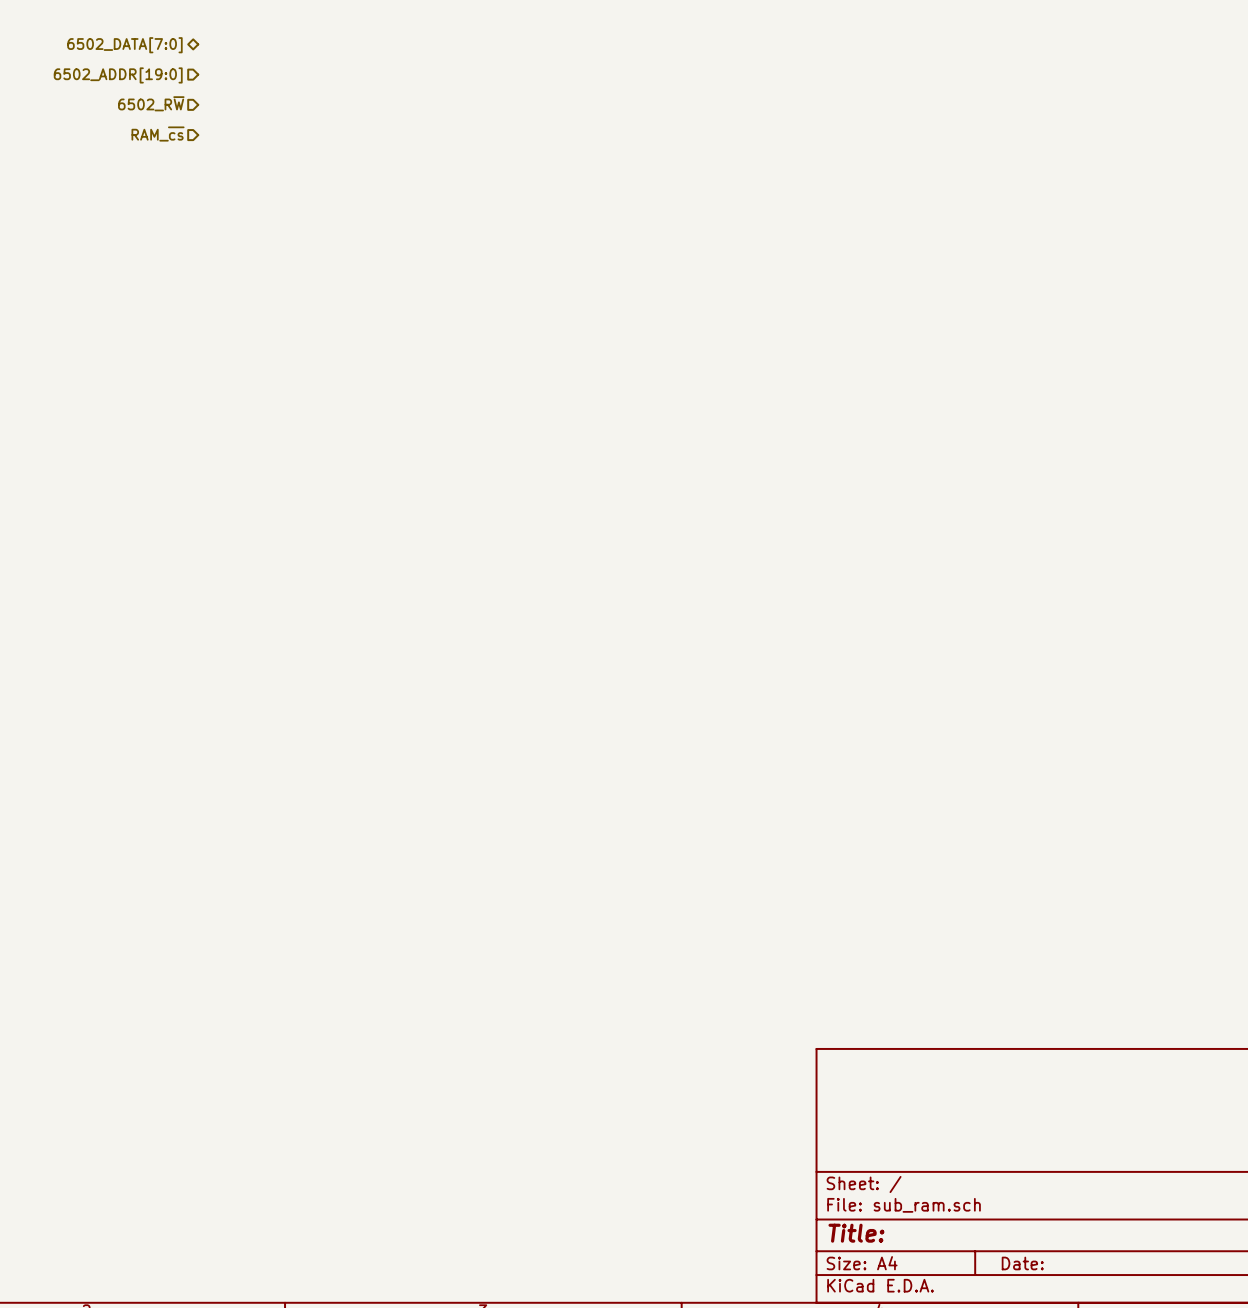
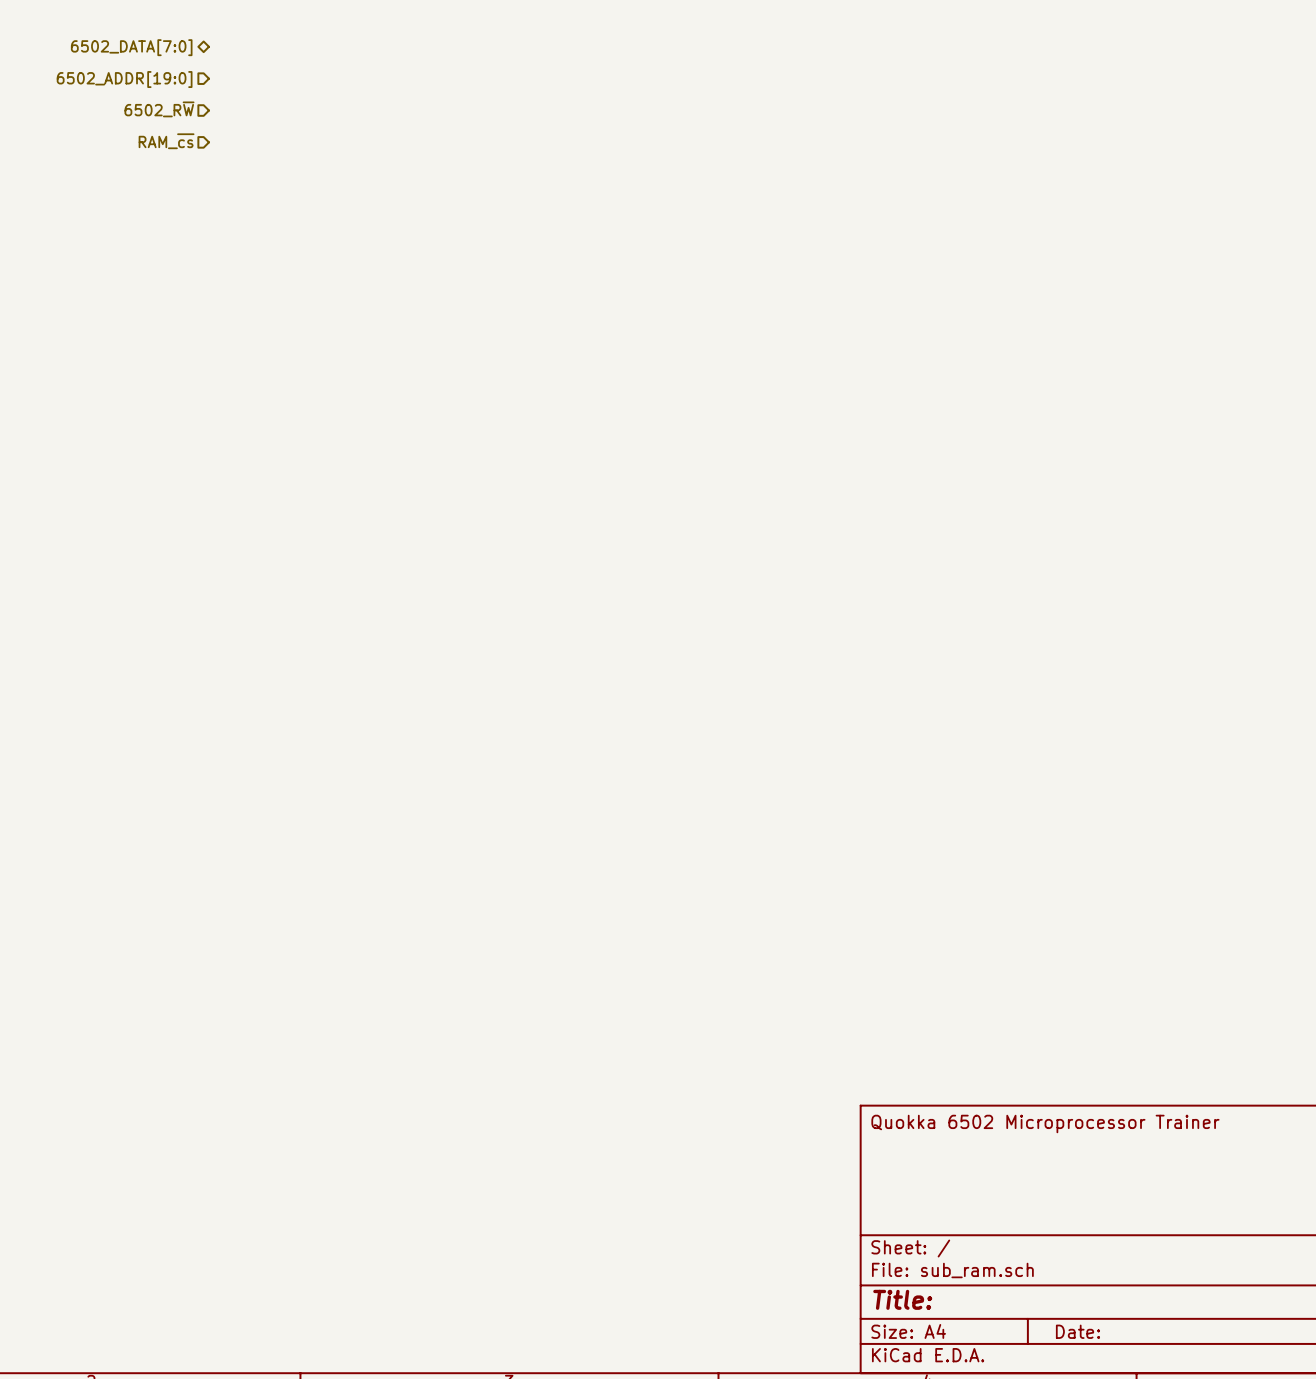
title block: none -> Quokka 6502 Microprocessor Trainer (1045, 1123)

